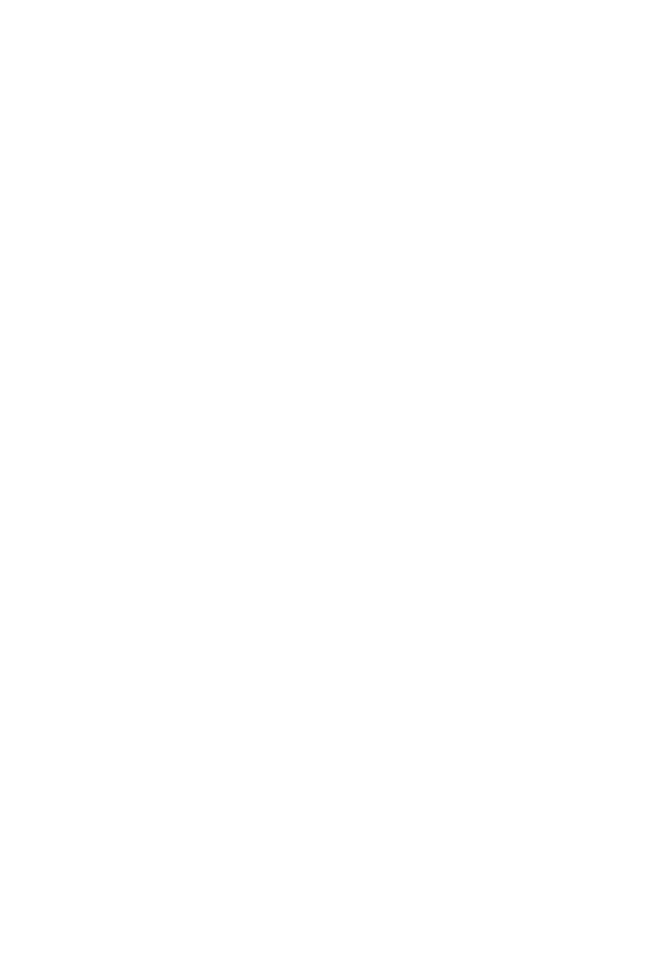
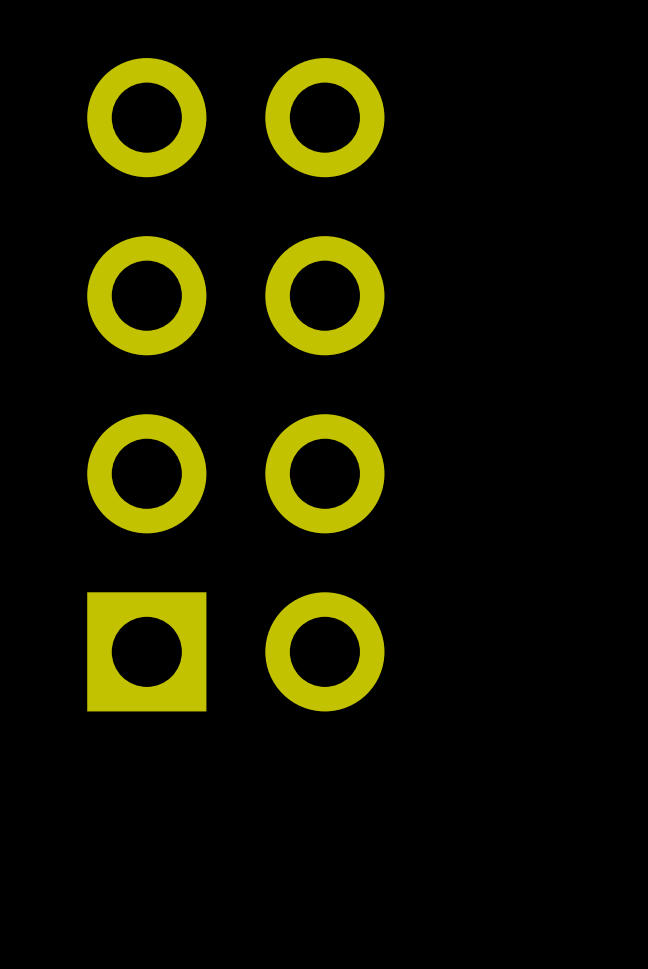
part: none -> (235, 384)

